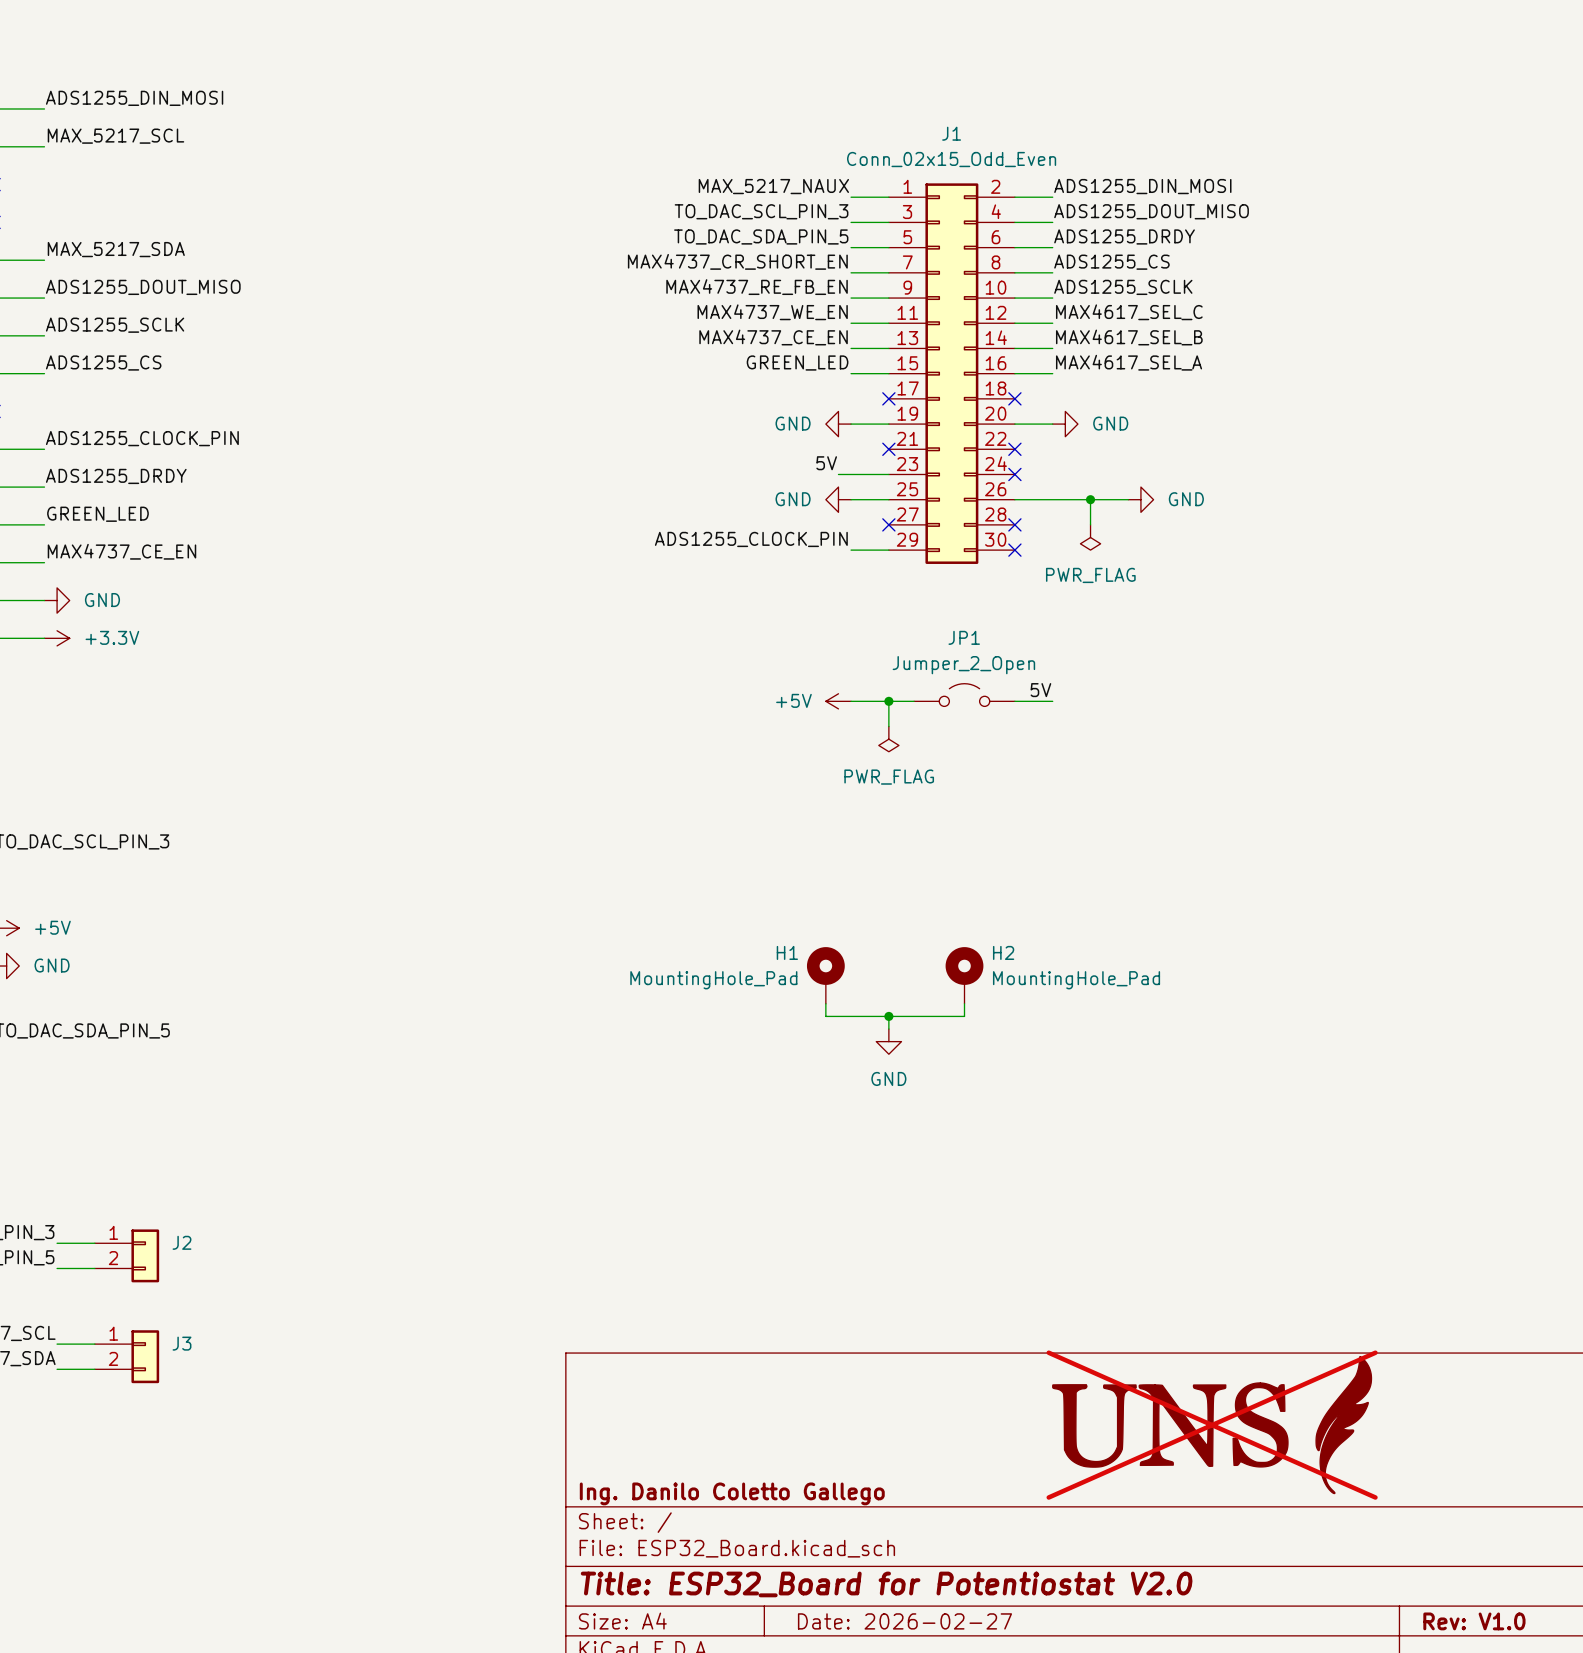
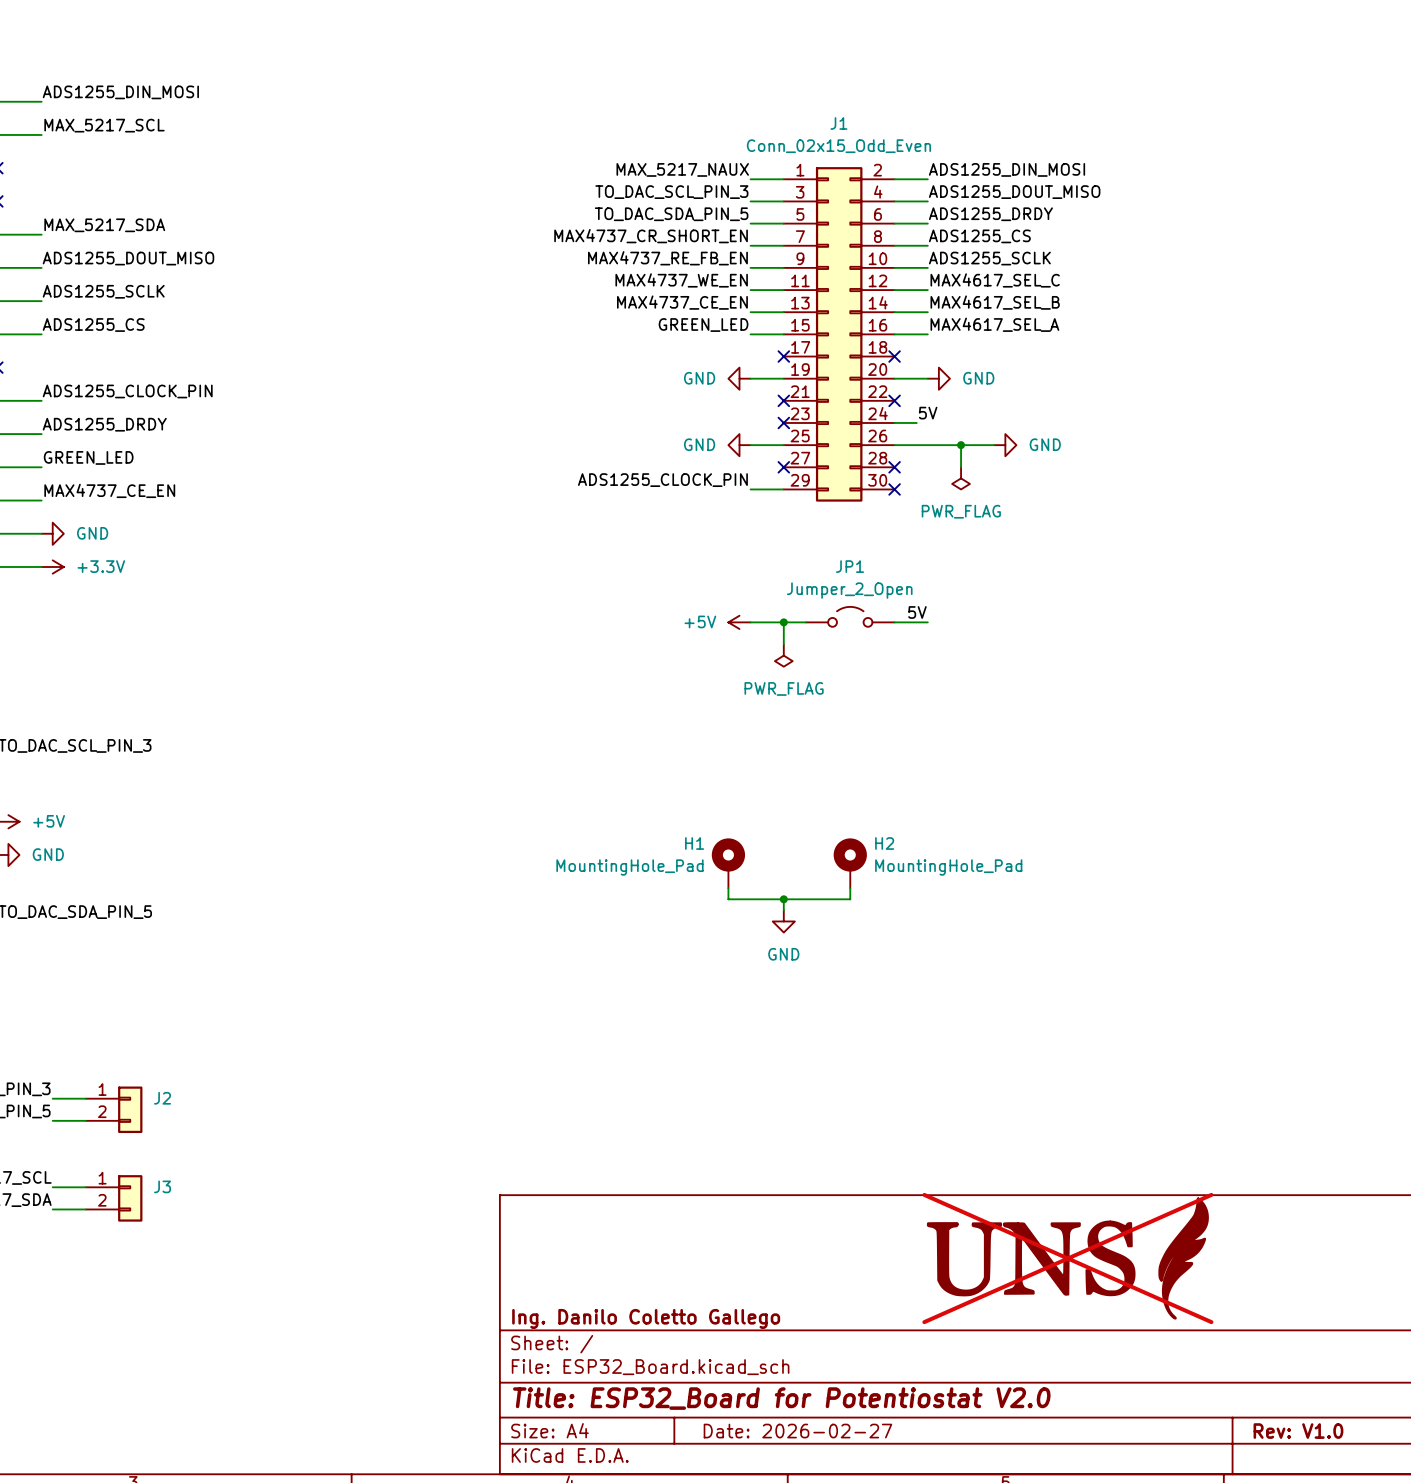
label position: 5V (826, 463) -> 5V (928, 413)
wire: (838, 474) (888, 474) -> none
no-connect mark: none -> (783, 422)
wire: none -> (894, 422) (916, 422)
no-connect mark: (1014, 474) -> none

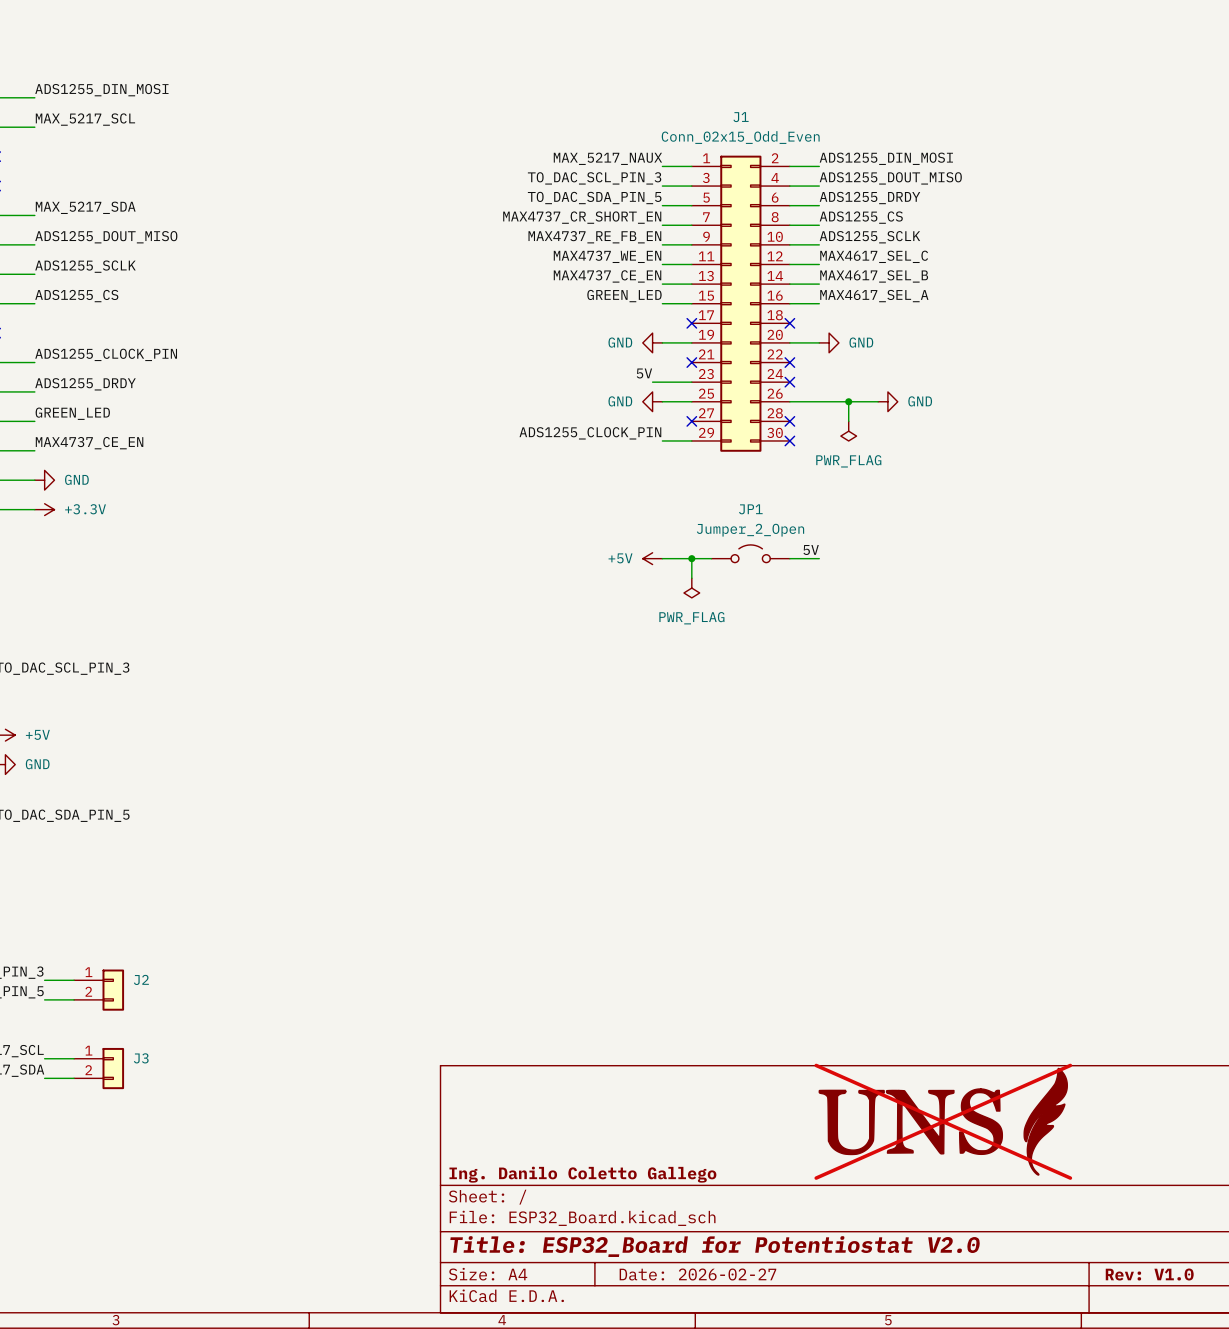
label position: 5V (928, 413) -> 5V (644, 373)
wire: none -> (652, 382) (691, 382)
no-connect mark: (783, 422) -> none
wire: (894, 422) (916, 422) -> none
no-connect mark: none -> (789, 382)
H1: MountingHole_Pad (728, 863) -> none
H2: MountingHole_Pad (850, 863) -> none
wire: (728, 888) (728, 899) (850, 899) (850, 888) -> none
wire: (783, 899) (783, 910) -> none
junction: (783, 899) -> none
power symbol: GND (783, 921) -> none

